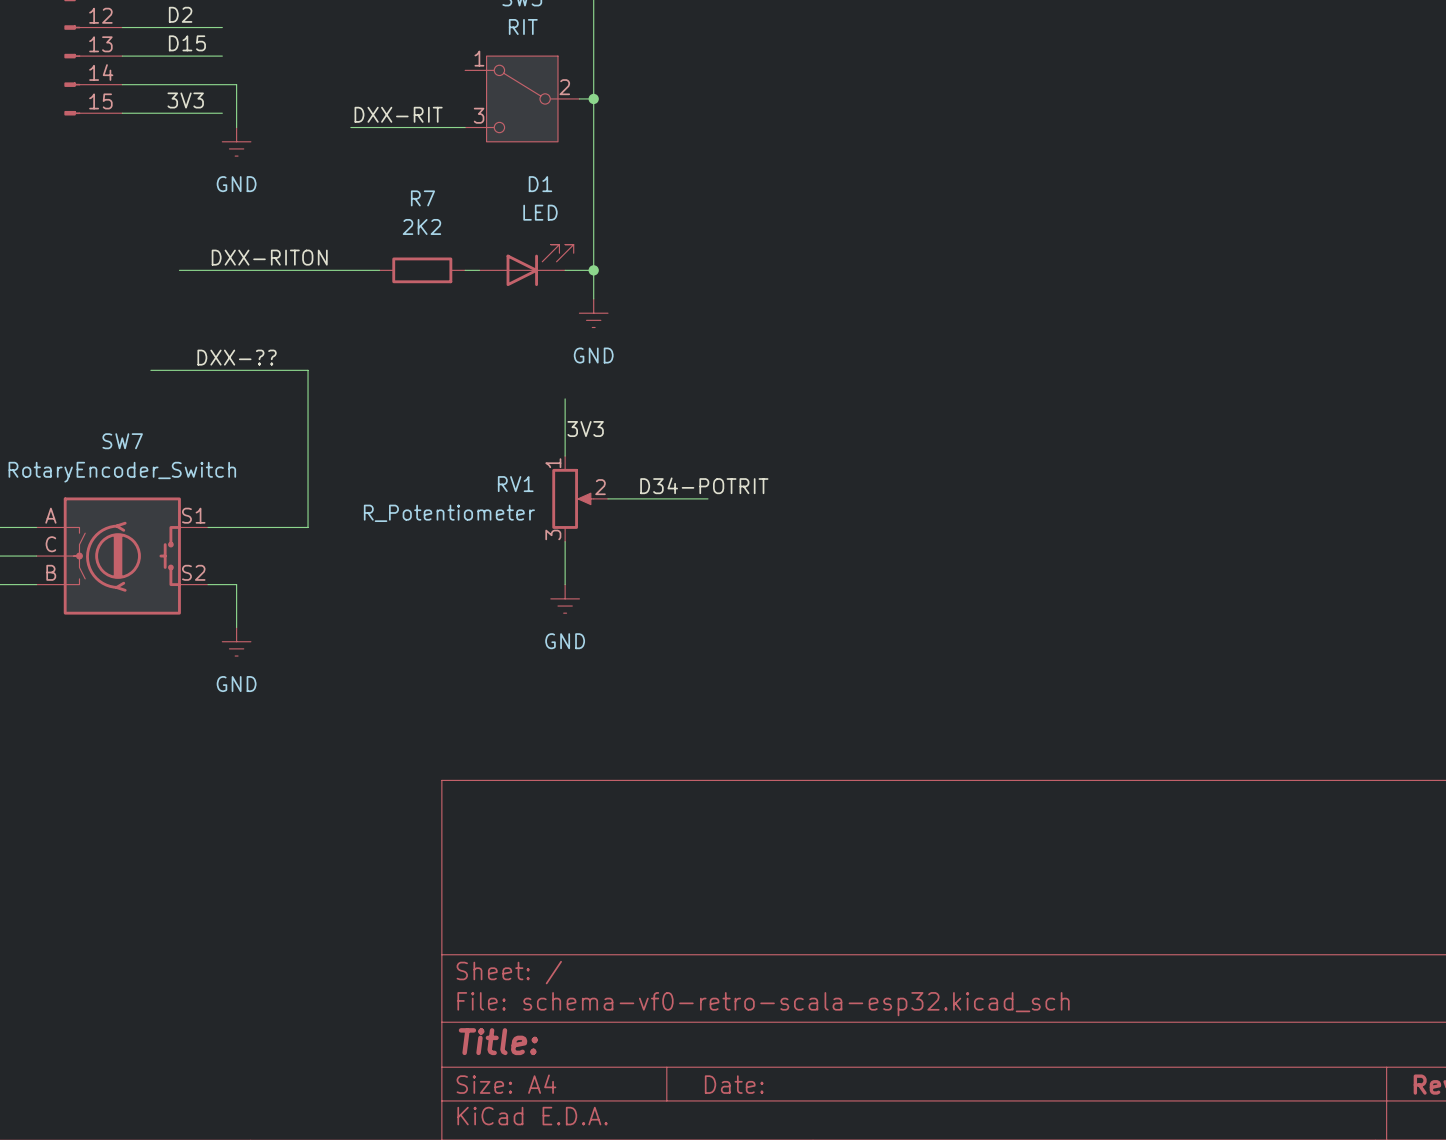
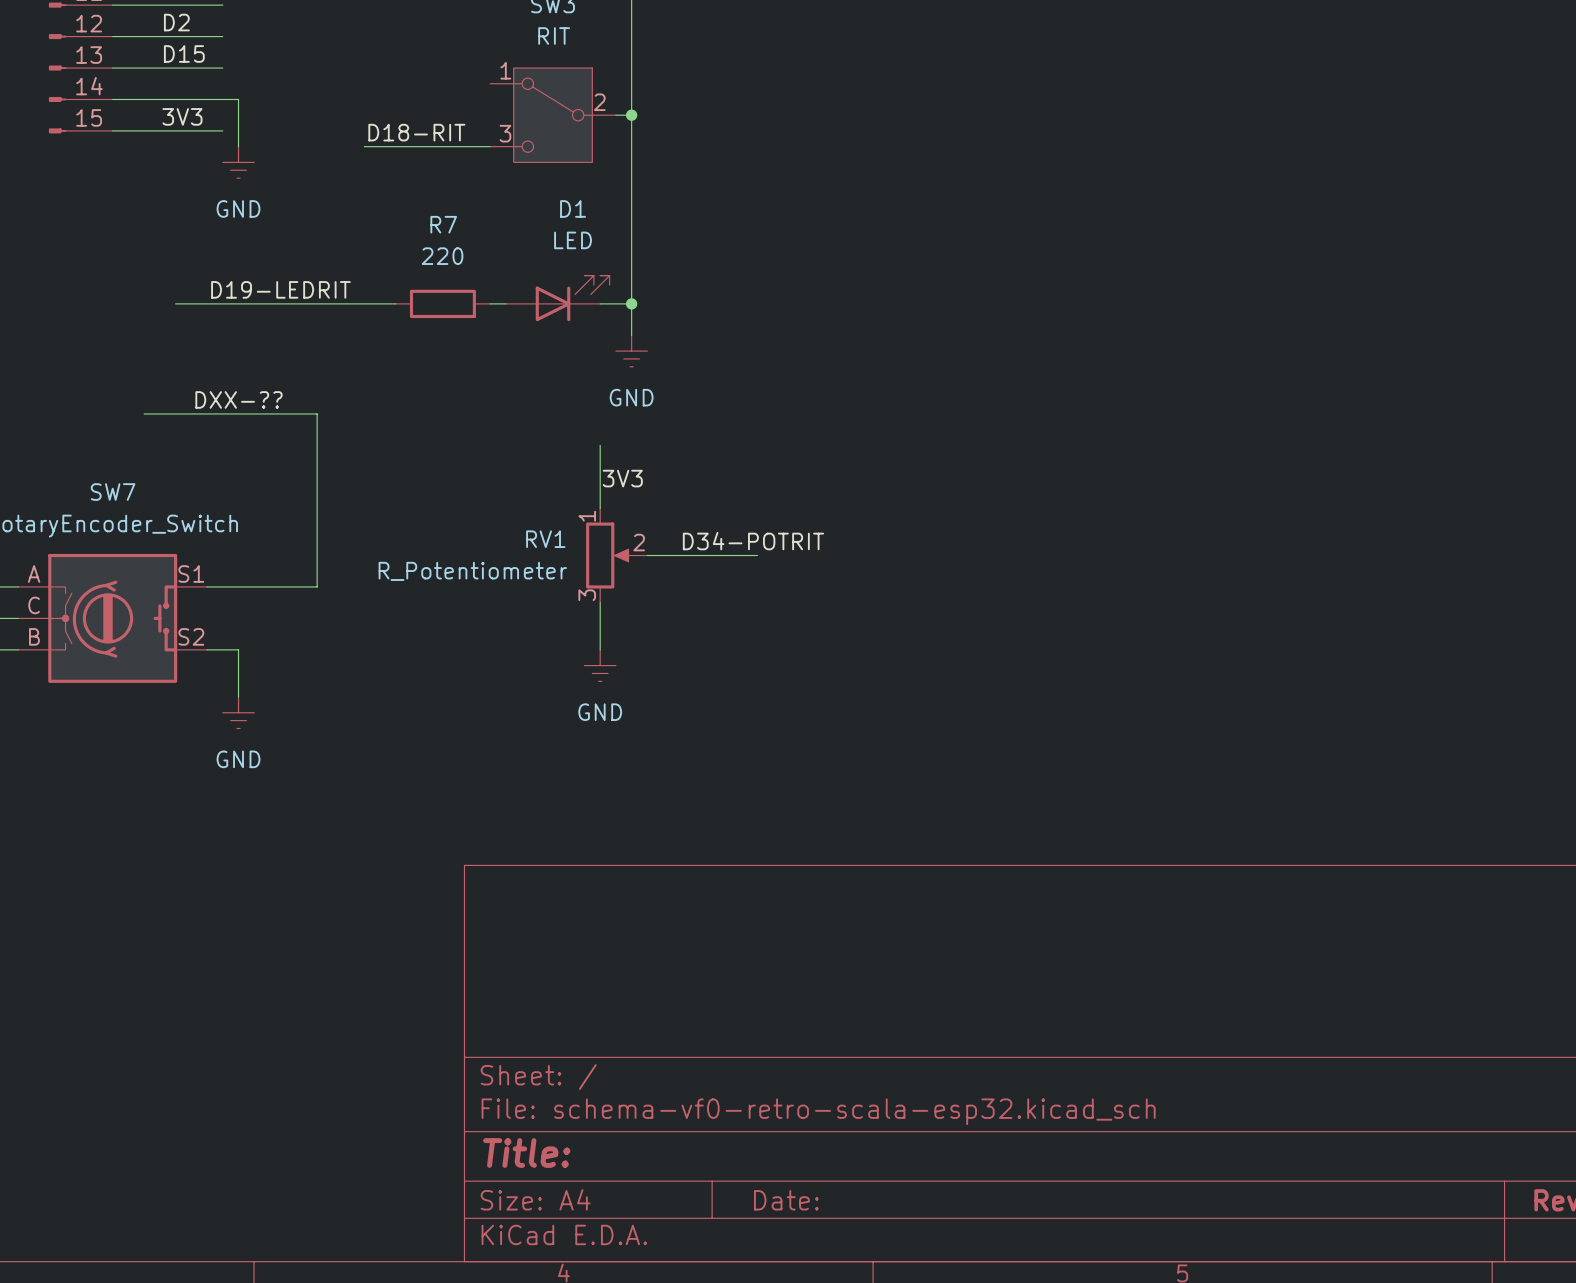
label: DXX-RIT (398, 114) -> D18-RIT (416, 132)
R7 value: 2K2 (421, 226) -> 220 (442, 256)
label: DXX-RITON (269, 257) -> D19-LEDRIT (280, 289)

